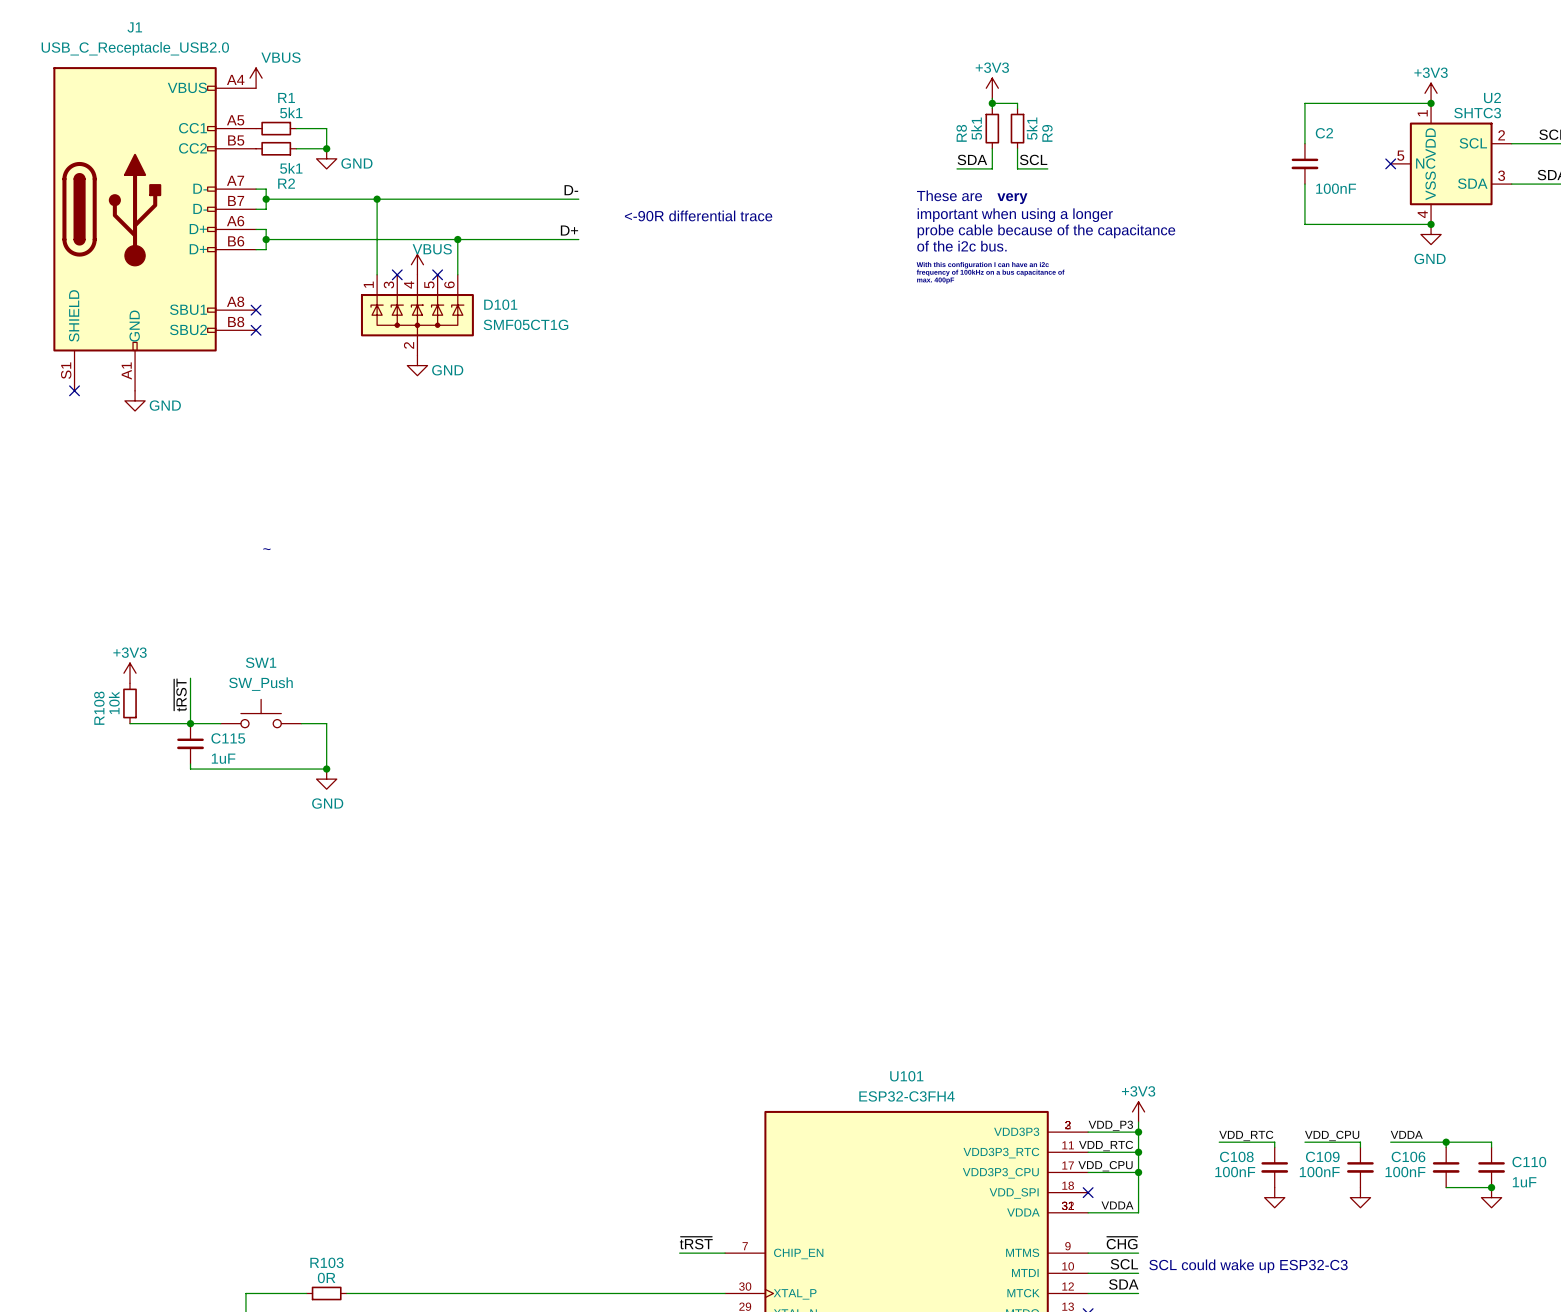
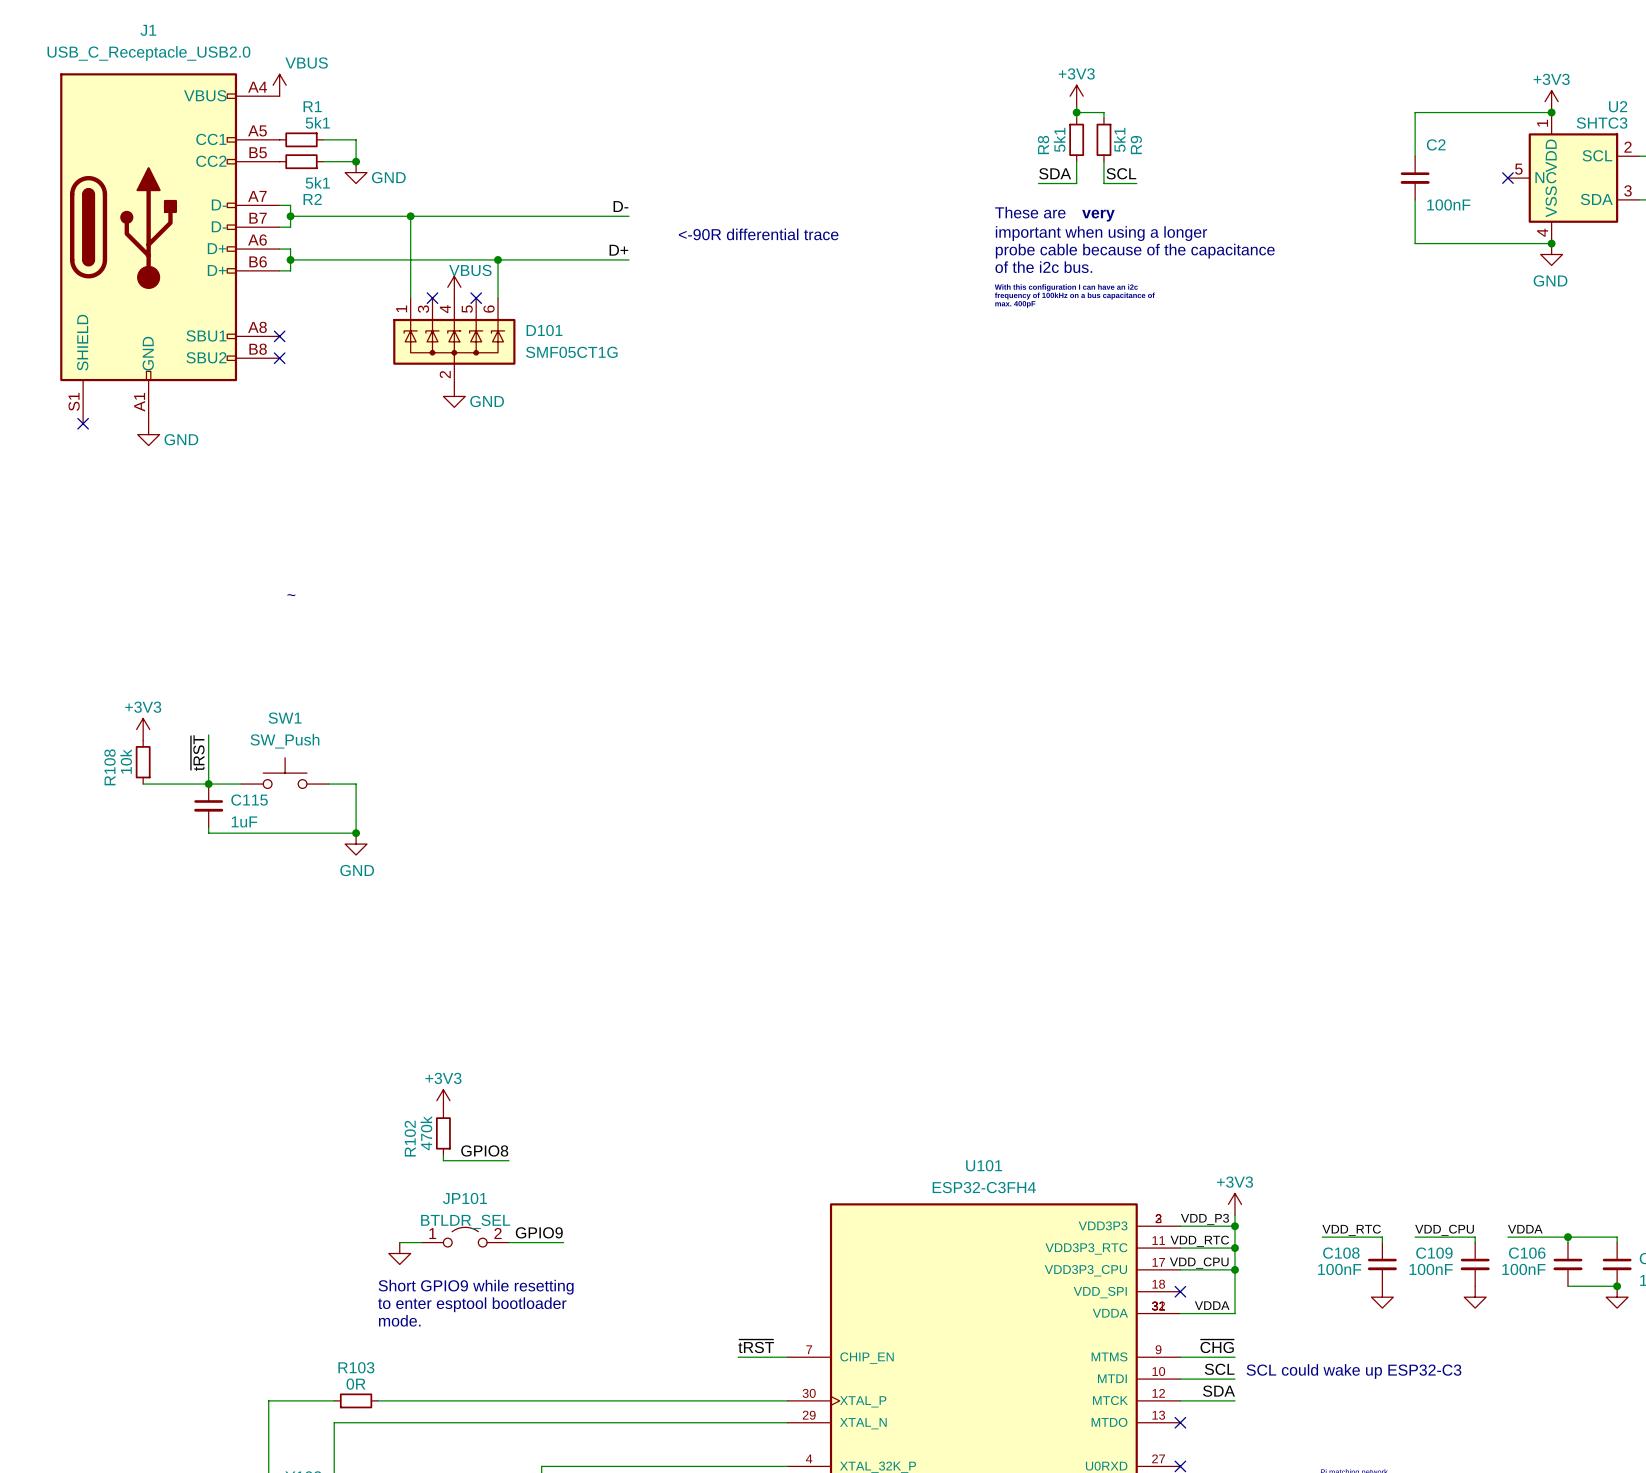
power symbol: none -> +3V3 (443, 1100)
R102: none -> 470k (443, 1133)
label: none -> GPIO8 (484, 1150)
wire: none -> (443, 1155) (443, 1160) (508, 1160)
label: none -> GPIO9 (539, 1232)
JP101: none -> BTLDR_SEL (465, 1237)
wire: none -> (399, 1242) (421, 1242)
wire: none -> (508, 1242) (563, 1242)
power symbol: none -> (399, 1253)
text: none -> Short GPIO9 while resetting (476, 1287)
text: none -> to enter esptool bootloader (472, 1304)
text: none -> mode. (399, 1320)

